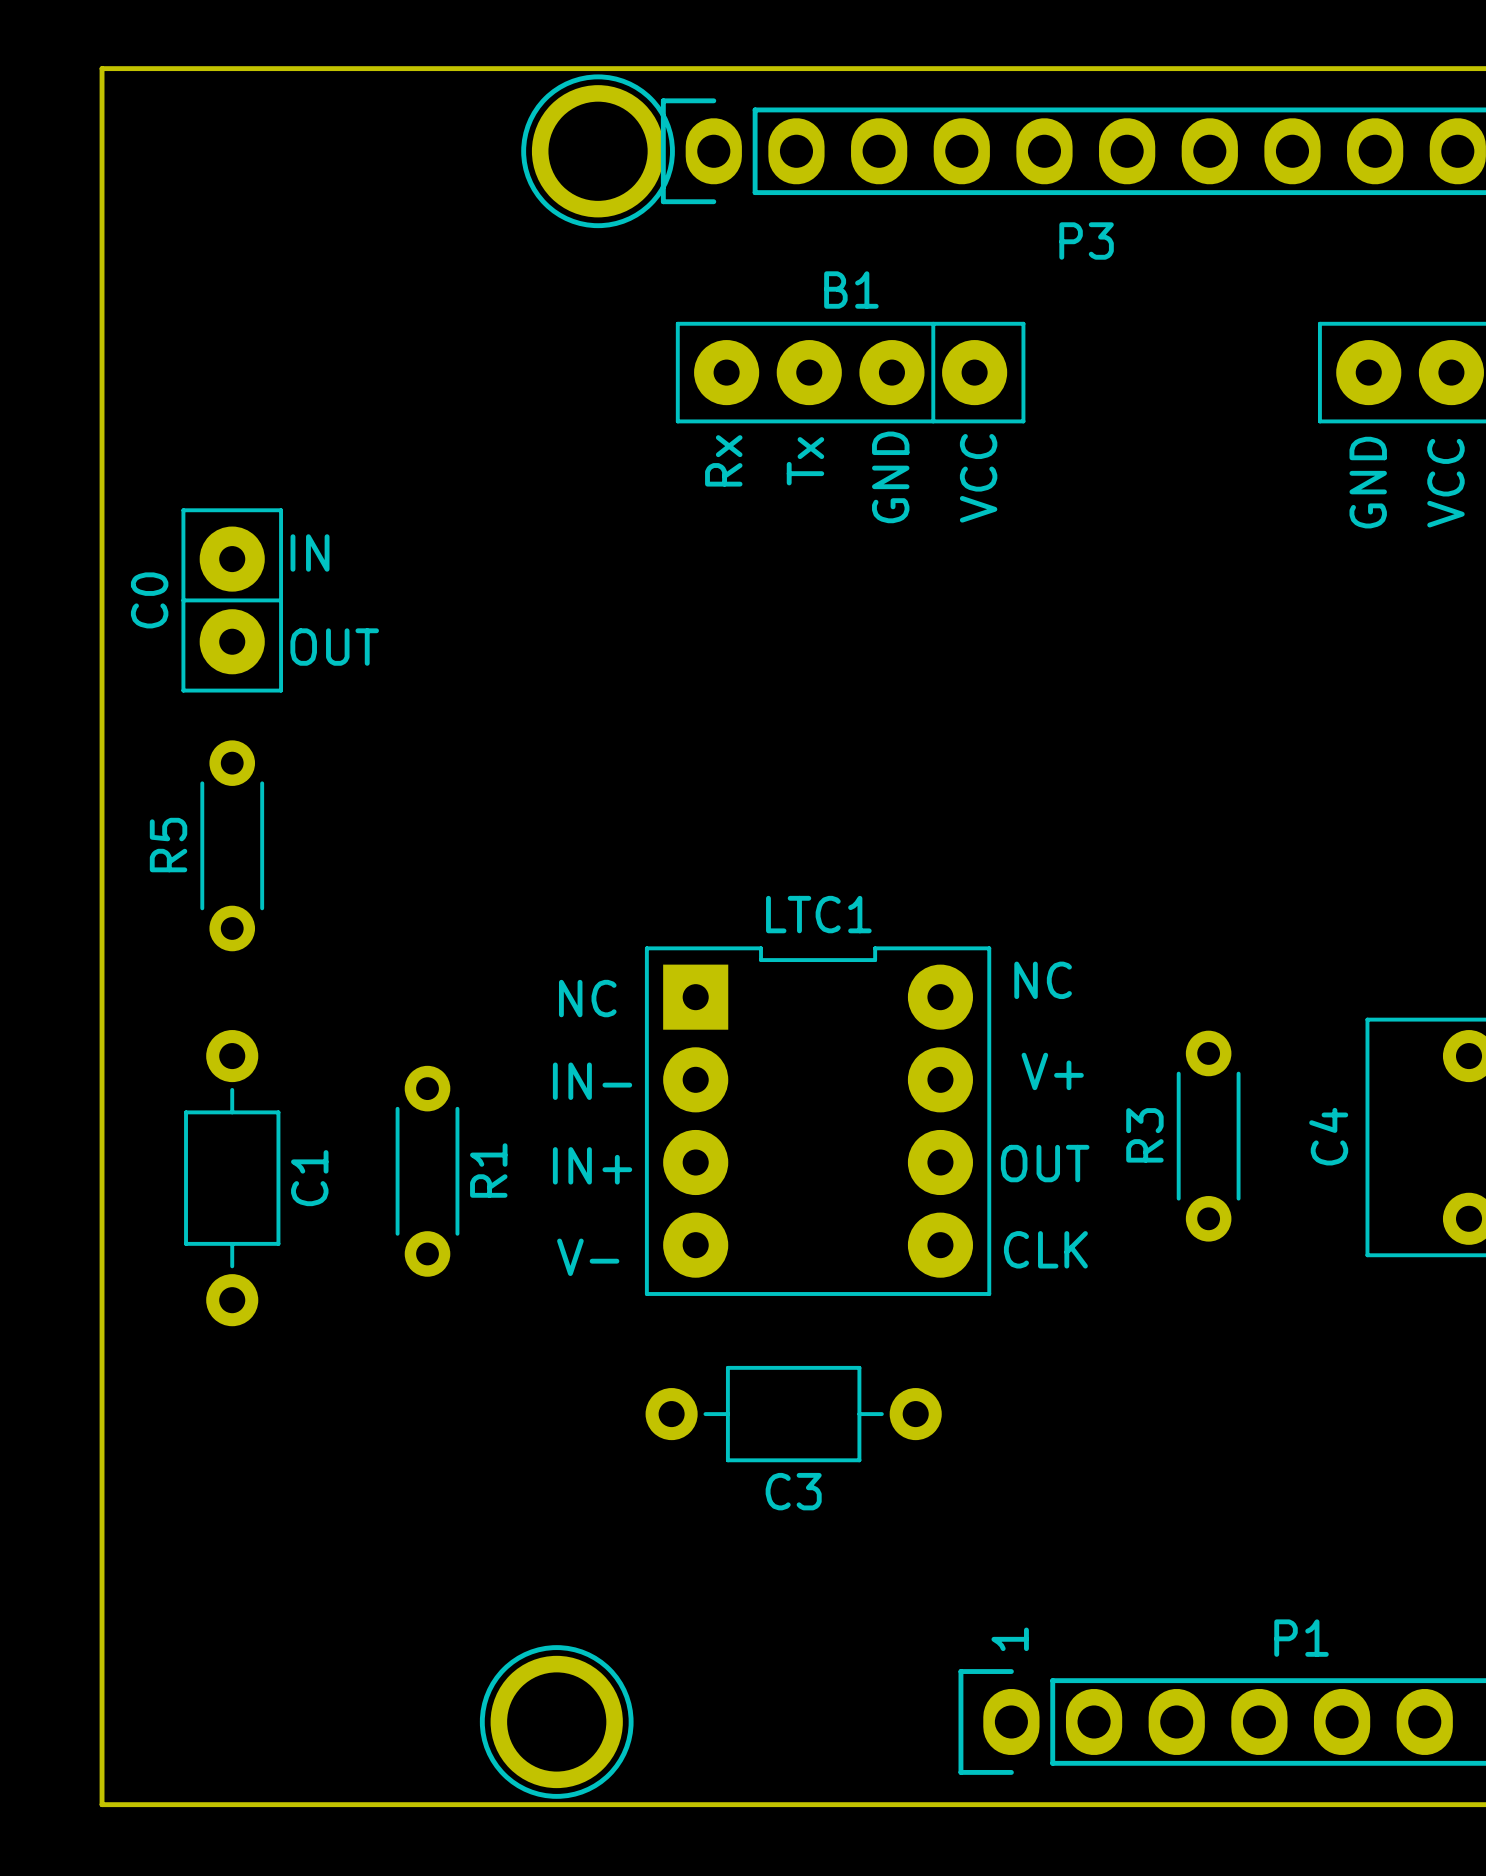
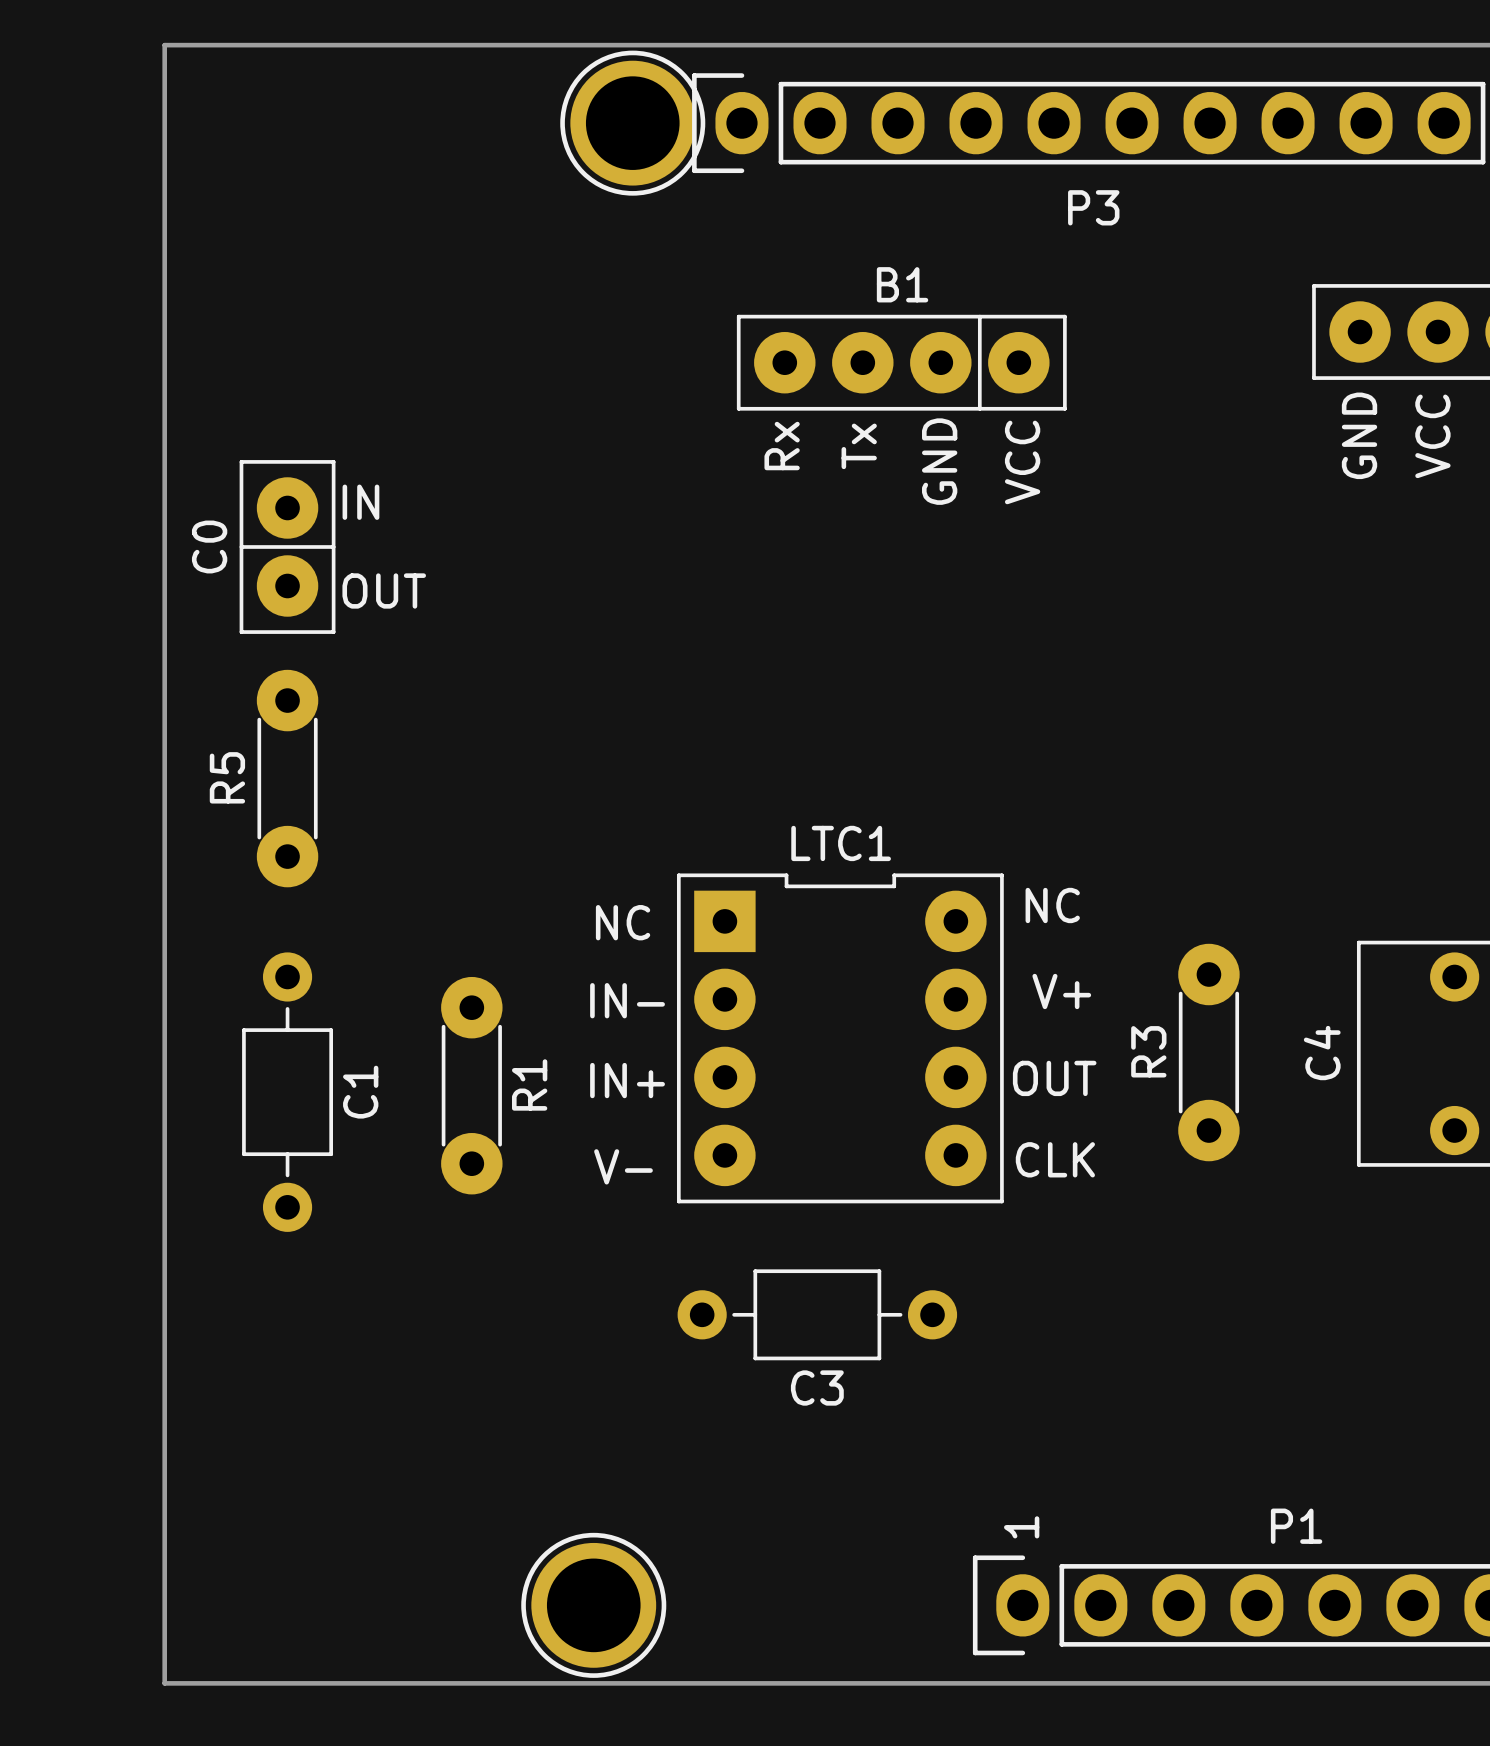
B1 position: (850, 372) -> (901, 362)
R5 footprint: [200, 740, 265, 952] -> [256, 669, 319, 888]
R3 footprint: [1176, 1030, 1241, 1242] -> [1178, 943, 1240, 1162]
R1 footprint: [395, 1065, 460, 1277] -> [441, 976, 503, 1195]

